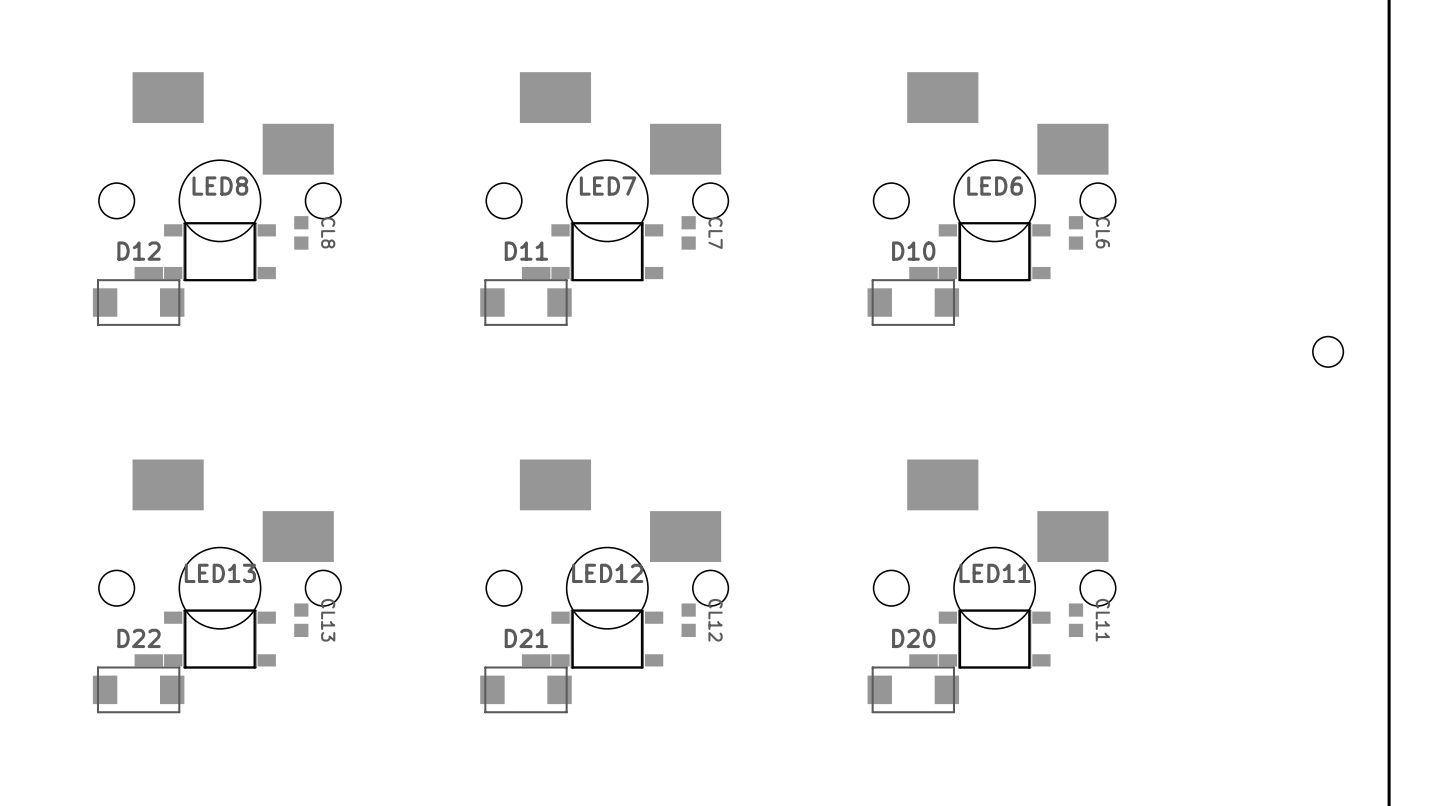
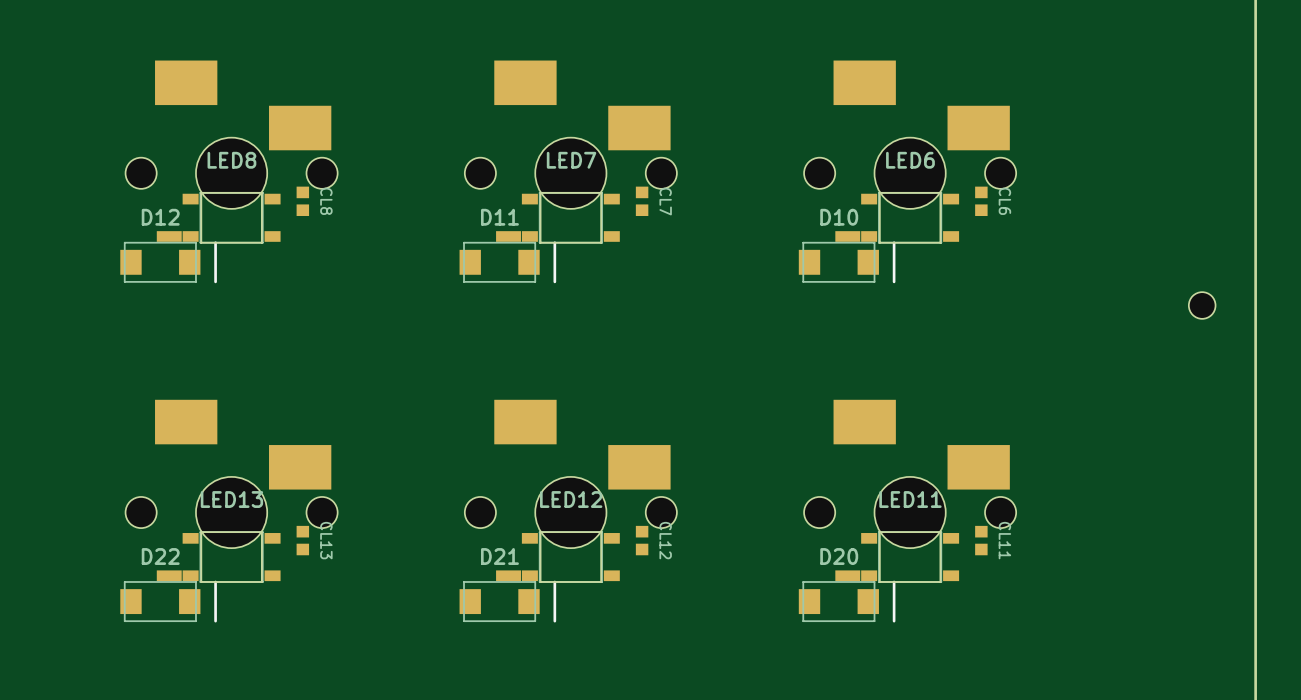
D12 footprint: [92, 279, 185, 326] -> [120, 241, 217, 284]
D11 footprint: [480, 279, 572, 326] -> [459, 241, 557, 284]
D10 footprint: [867, 279, 960, 326] -> [798, 241, 896, 284]
D22 footprint: [92, 666, 185, 714] -> [120, 580, 217, 623]
D21 footprint: [480, 666, 572, 714] -> [459, 580, 557, 623]
D20 footprint: [867, 666, 960, 714] -> [798, 580, 896, 623]

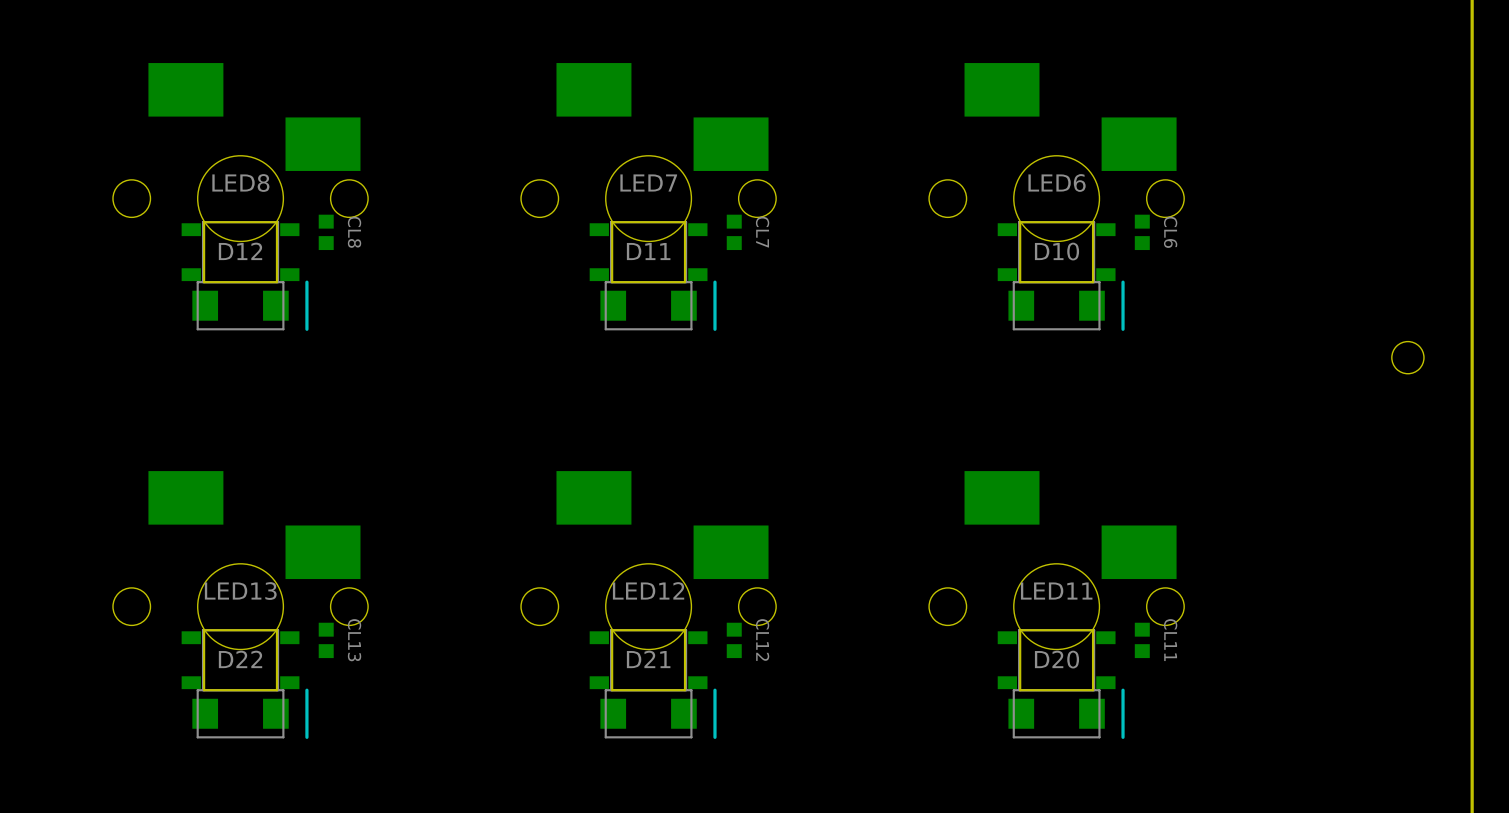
LED8 footprint: [156, 191, 281, 244] -> [181, 221, 300, 284]
LED7 footprint: [496, 191, 620, 244] -> [589, 221, 708, 284]
LED6 footprint: [835, 191, 960, 244] -> [997, 221, 1116, 284]
D12 position: (168, 262) -> (250, 305)
D11 position: (507, 262) -> (658, 305)
D10 position: (847, 262) -> (1066, 305)
LED13 footprint: [156, 531, 281, 583] -> [181, 629, 300, 692]
LED12 footprint: [496, 531, 620, 583] -> [589, 629, 708, 692]
LED11 footprint: [835, 531, 960, 583] -> [997, 629, 1116, 692]
D22 position: (168, 601) -> (250, 713)
D21 position: (507, 601) -> (658, 713)
D20 position: (847, 601) -> (1066, 713)

